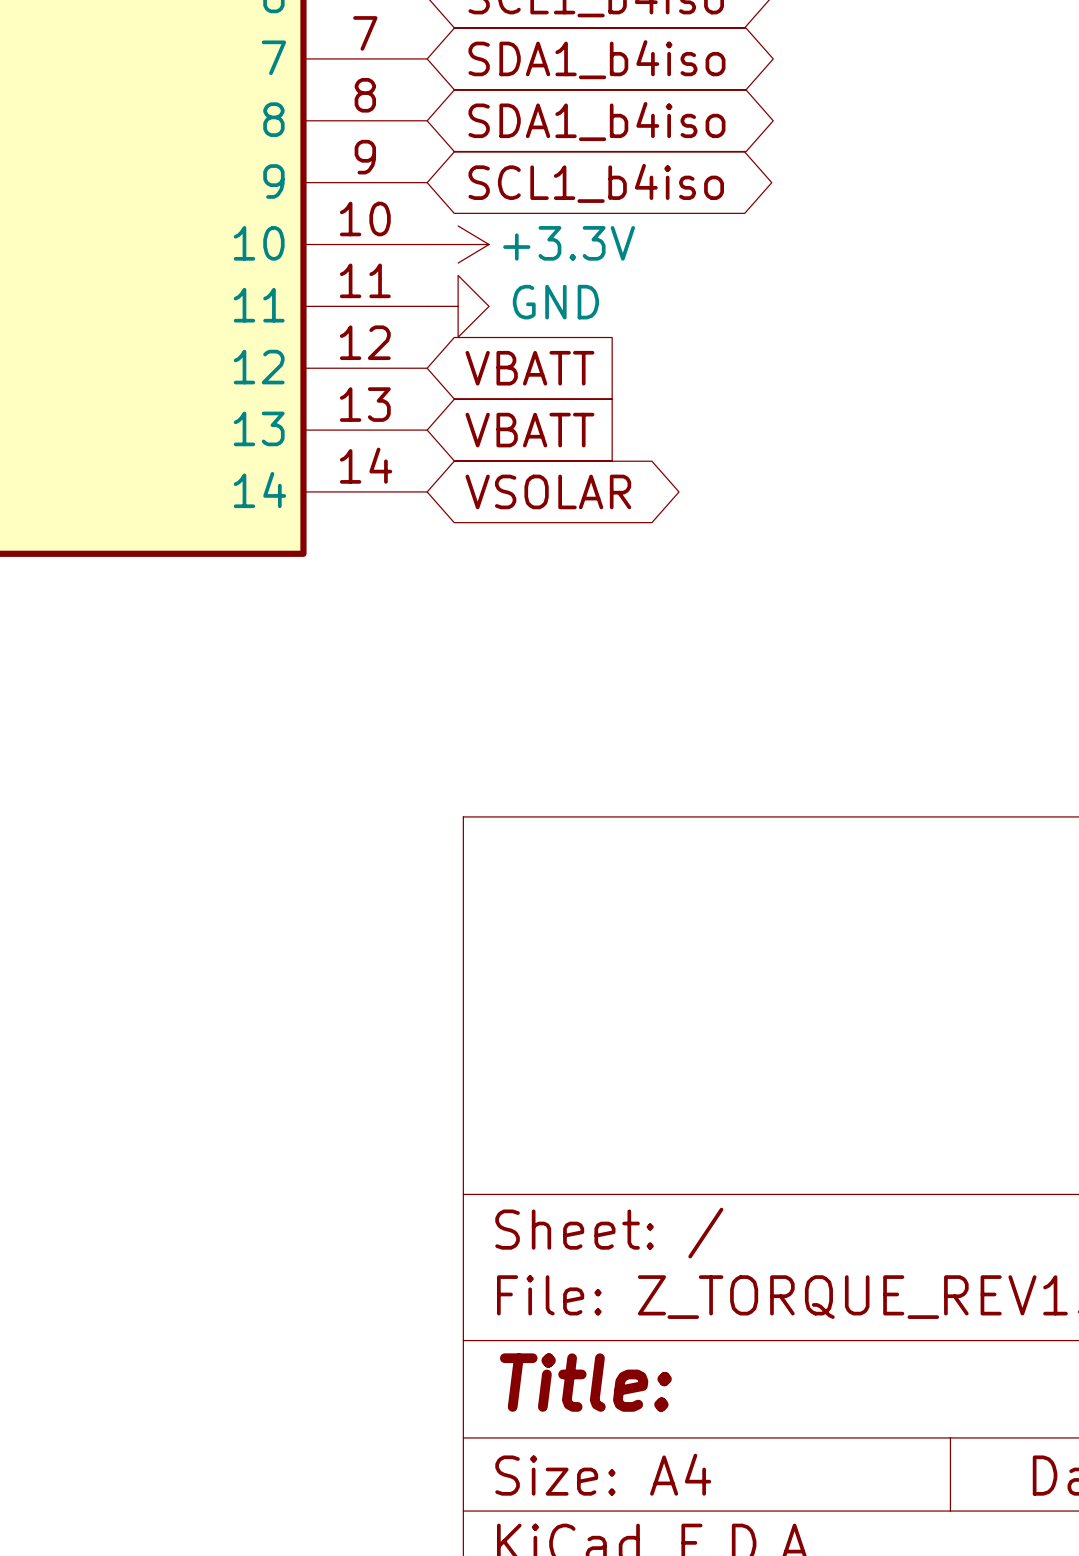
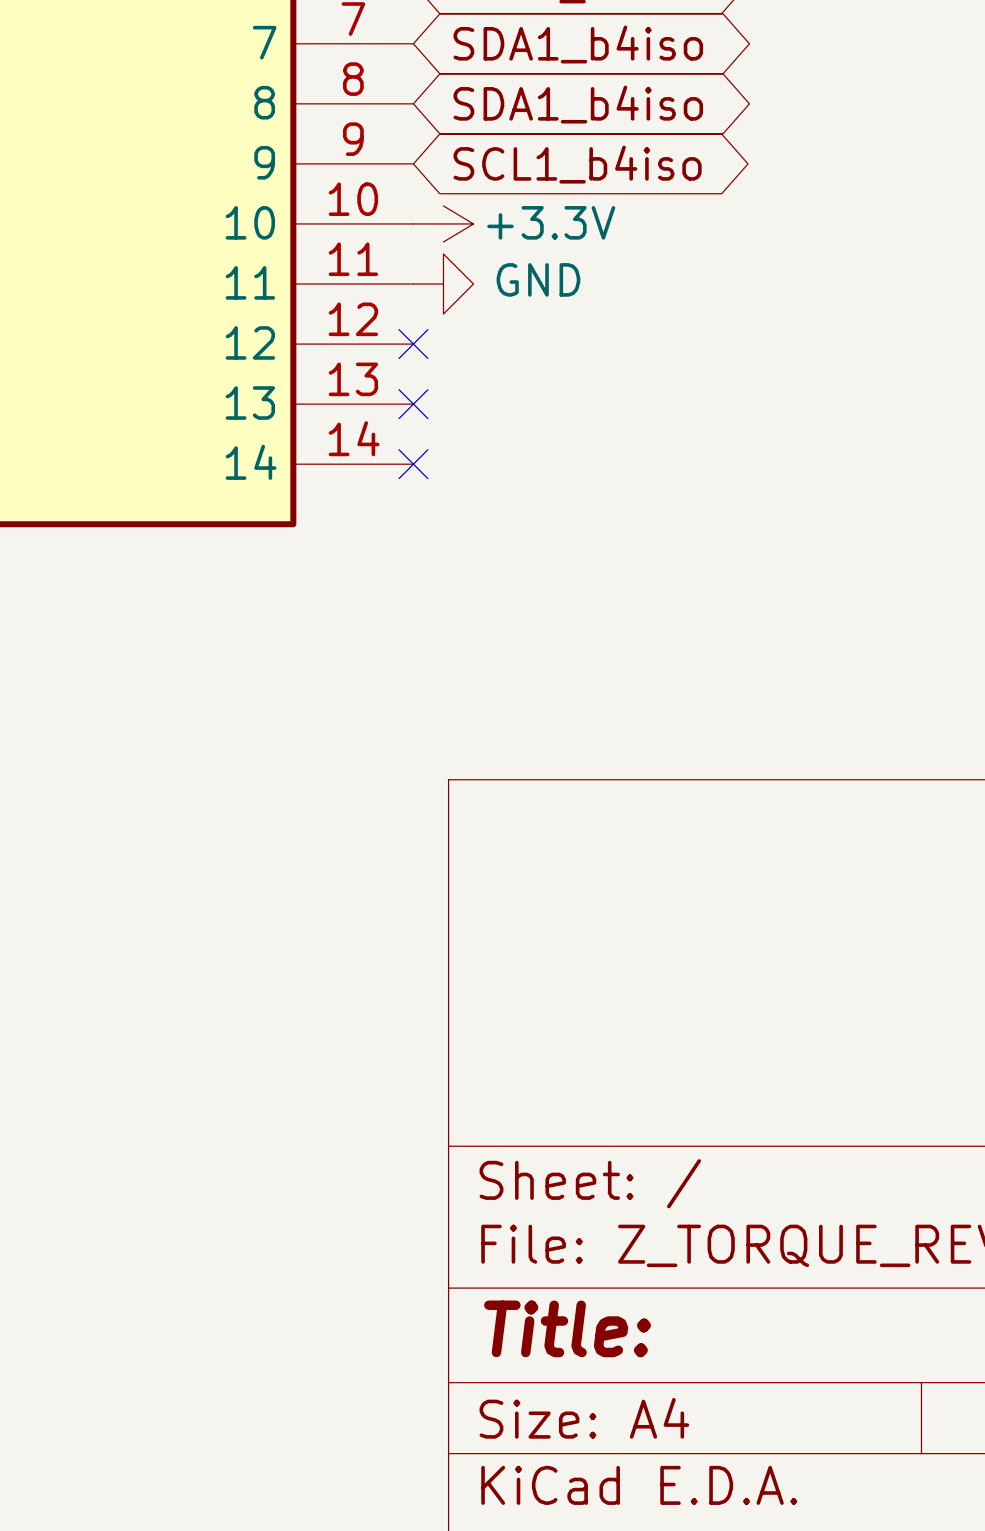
no-connect mark: none -> (413, 344)
global label: VBATT (529, 368) -> none
no-connect mark: none -> (413, 404)
global label: VBATT (529, 430) -> none
no-connect mark: none -> (413, 464)
global label: VSOLAR (548, 491) -> none

